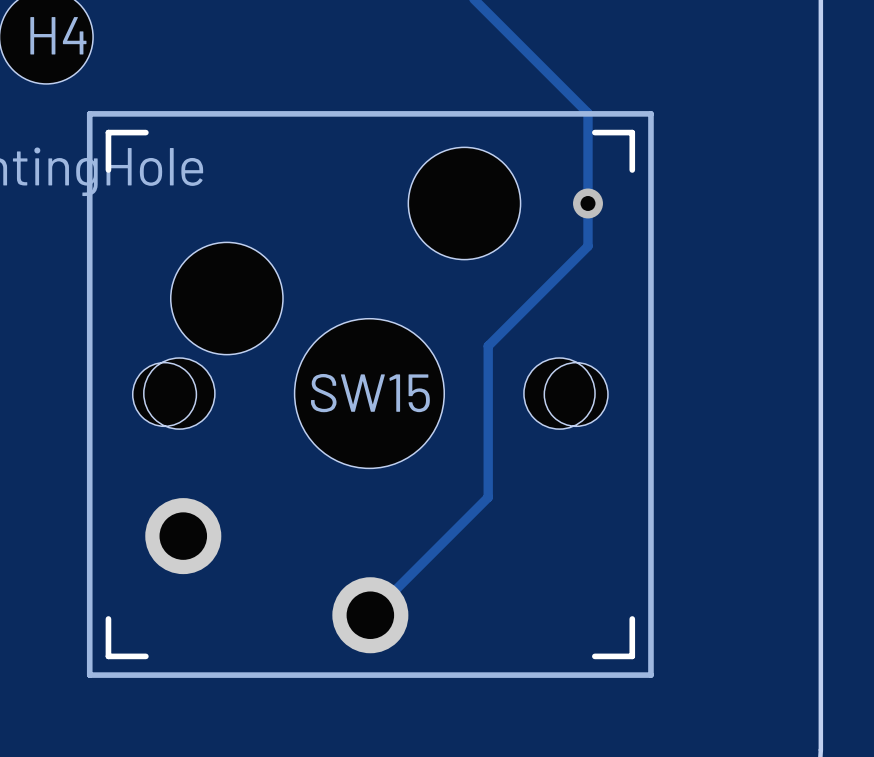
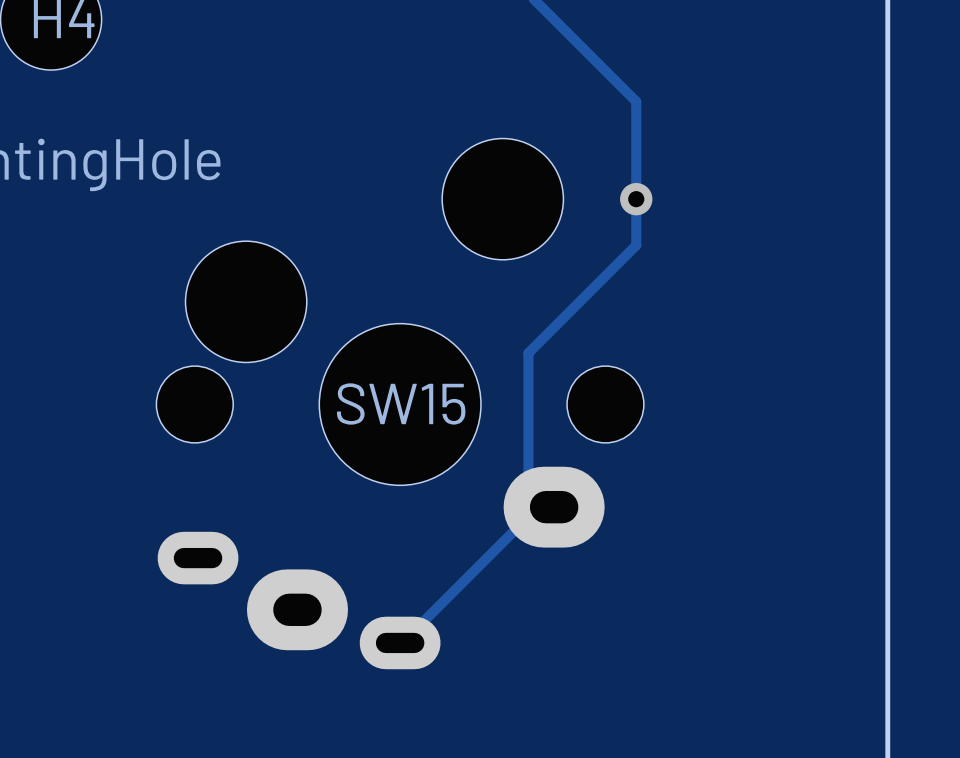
SW15 footprint: [86, 111, 654, 678] -> [156, 138, 644, 670]

